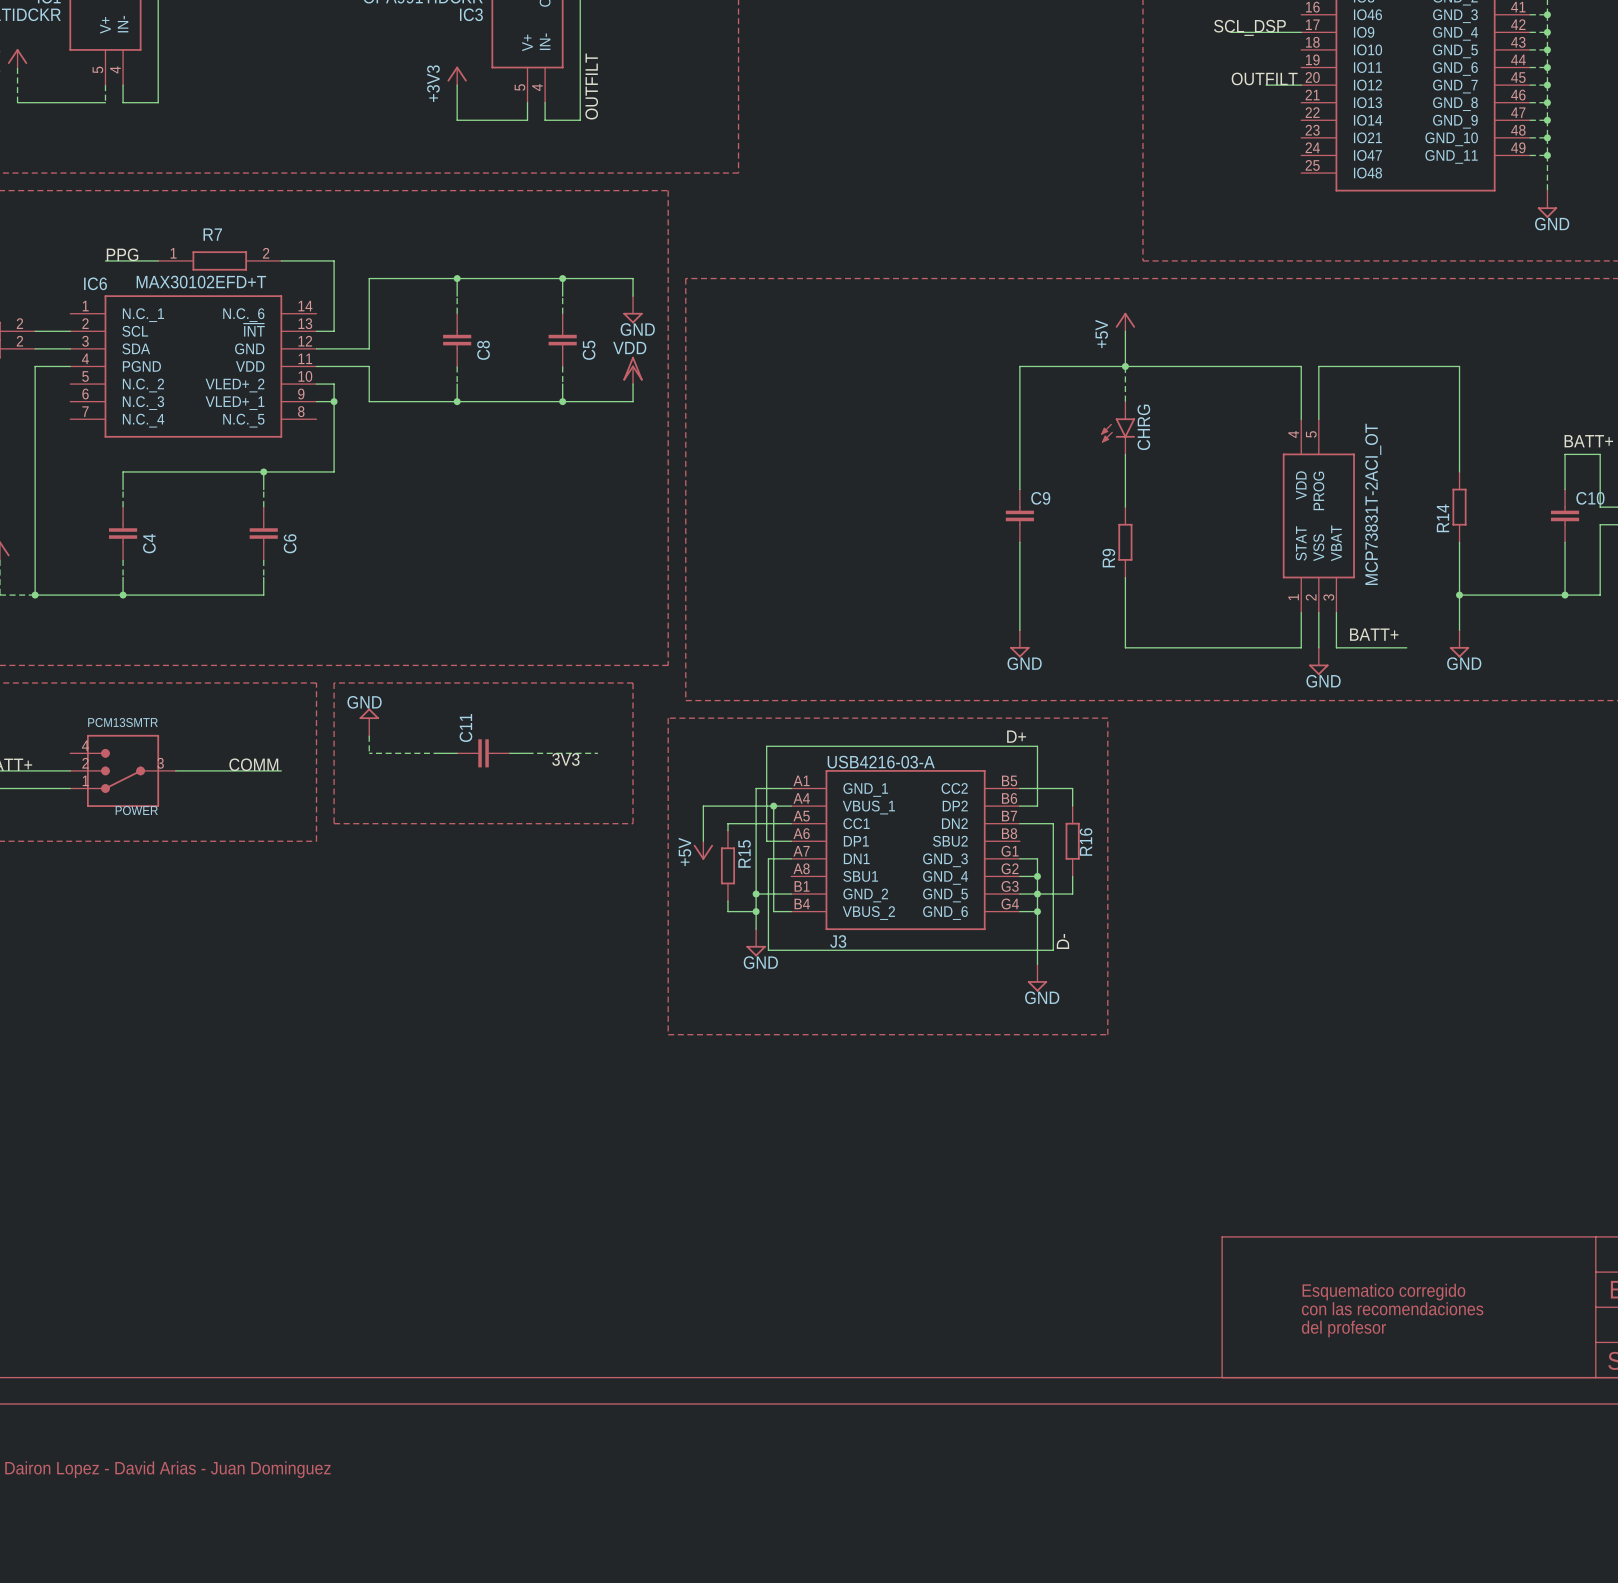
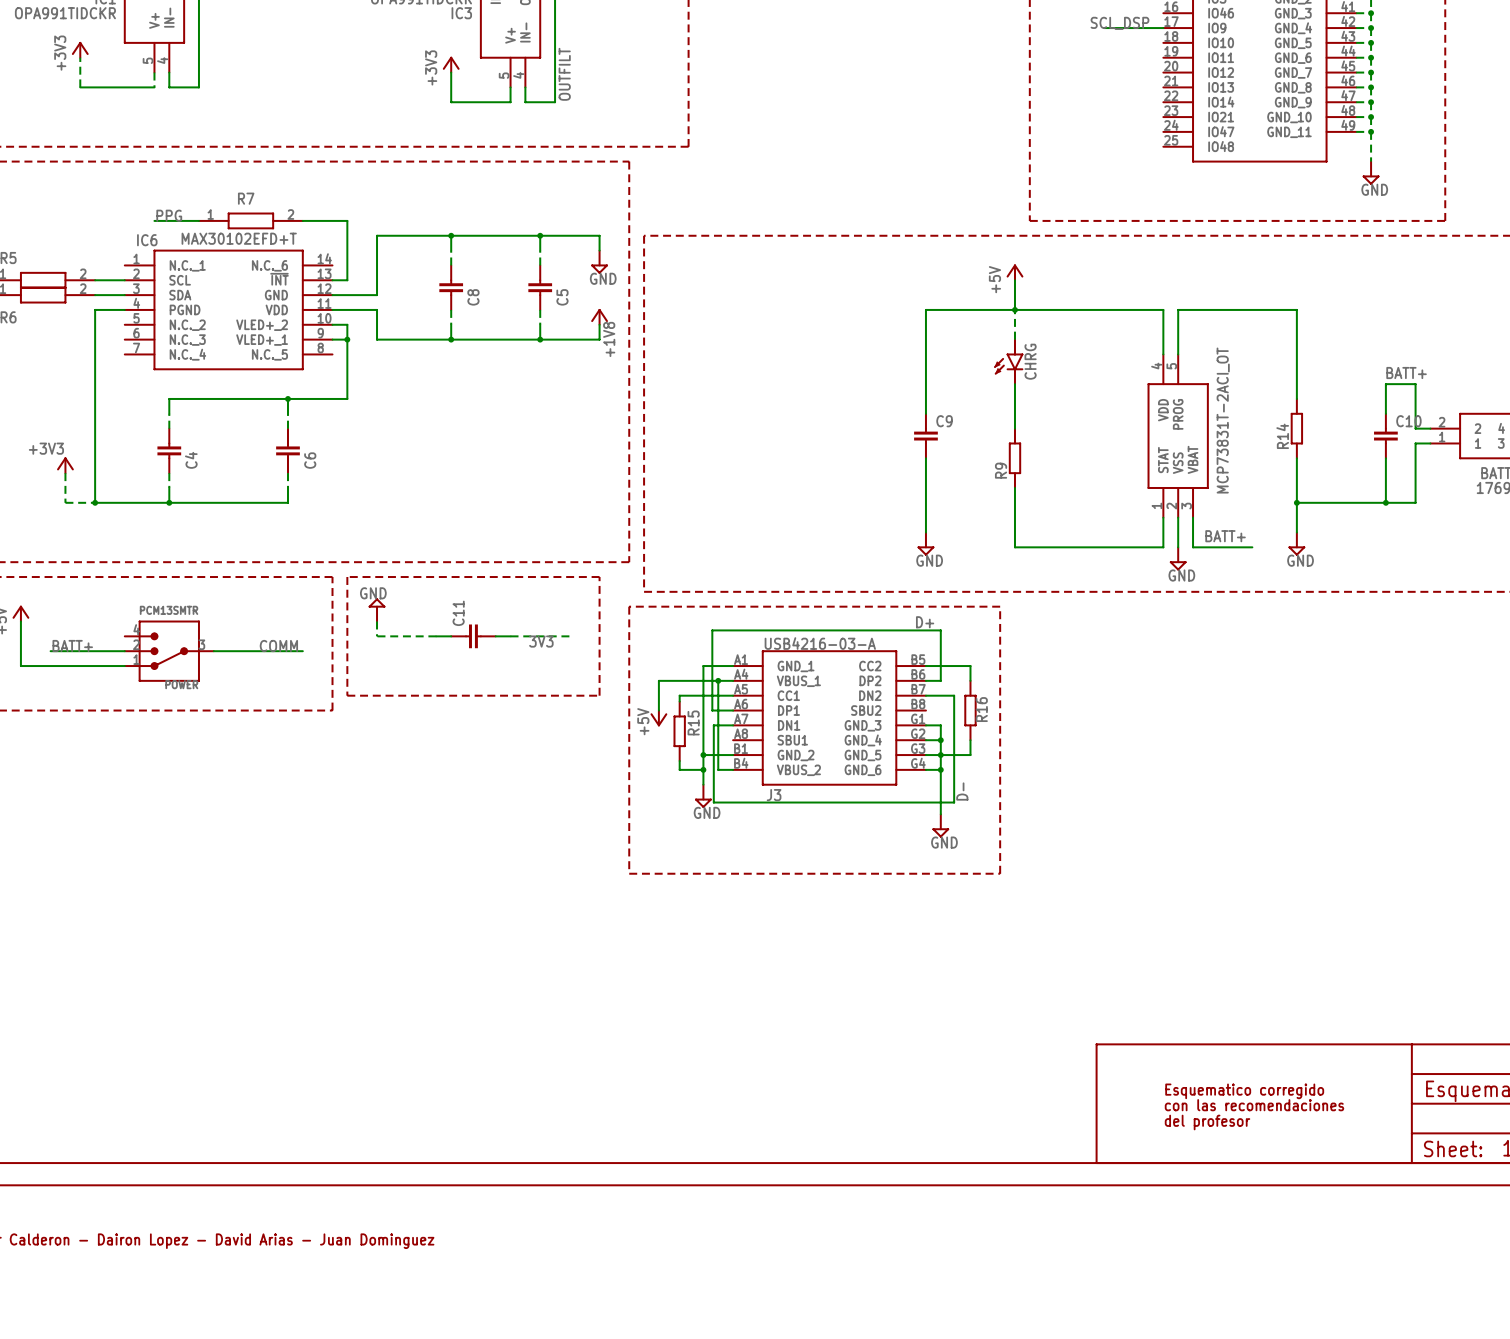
label: OUTFILT (1264, 78) -> none
wire: (1266, 85) (1301, 85) -> none
power symbol text: VDD (629, 348) -> none
power symbol shape: [623, 356, 643, 385] -> [591, 309, 608, 325]
label: none -> +1V8 (609, 339)

